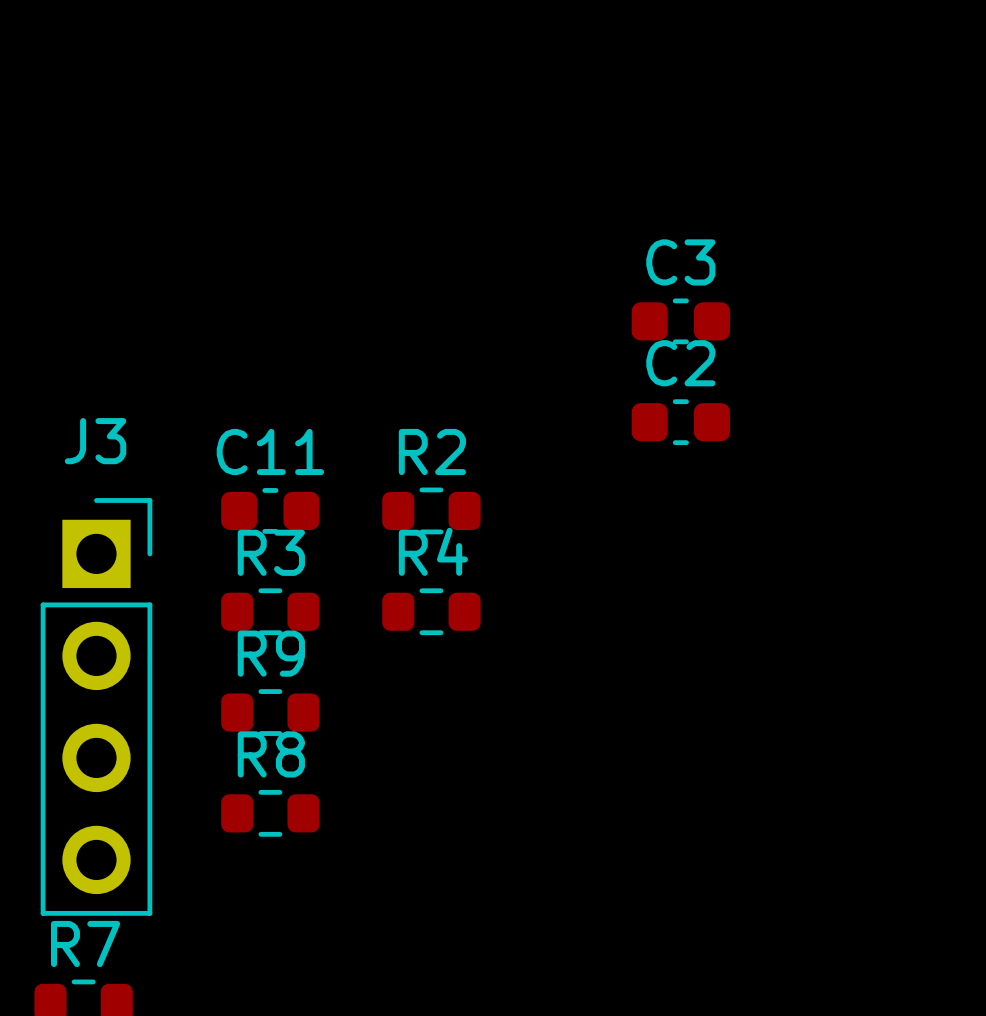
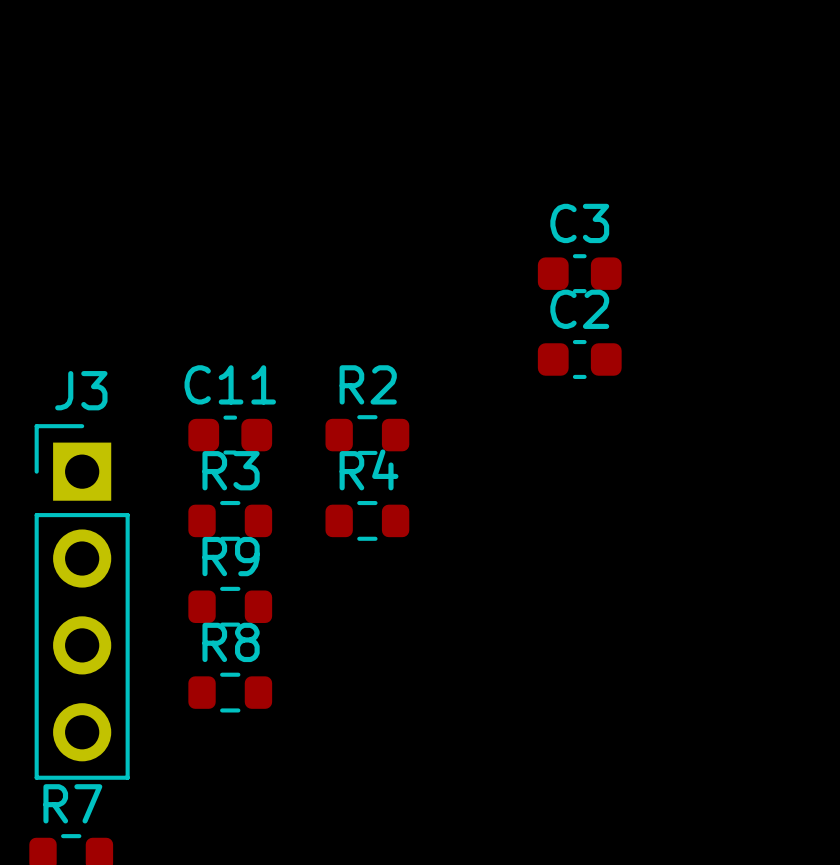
J3 footprint: [40, 498, 153, 916] -> [34, 424, 130, 780]

